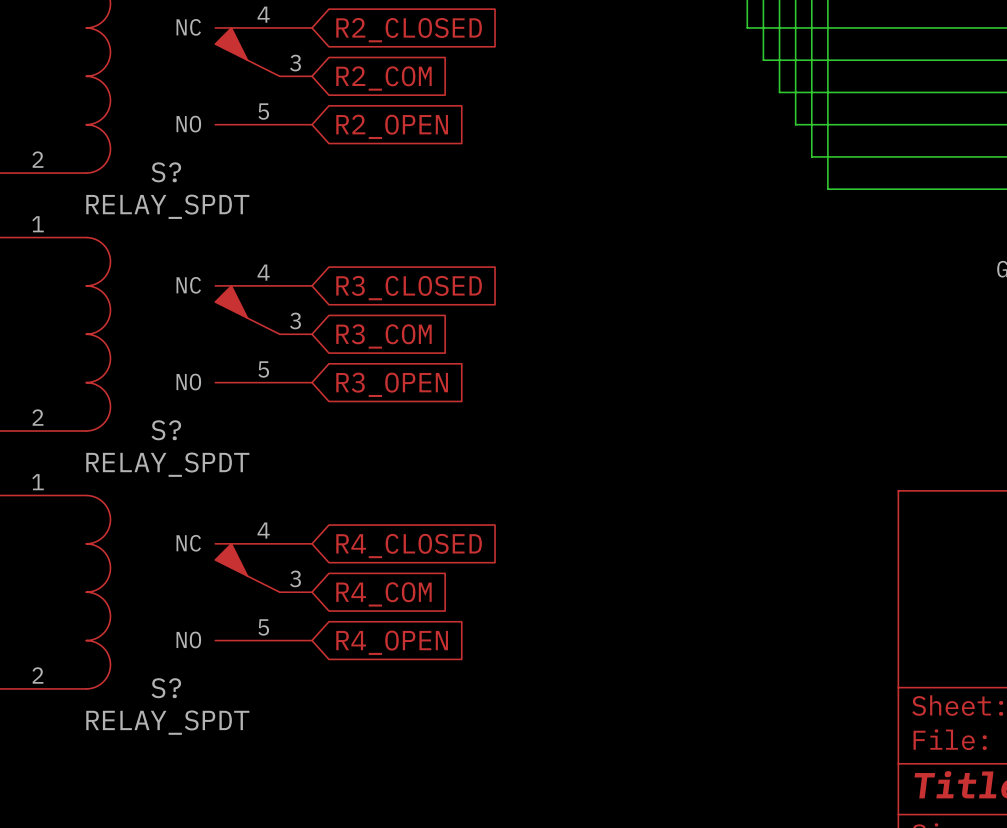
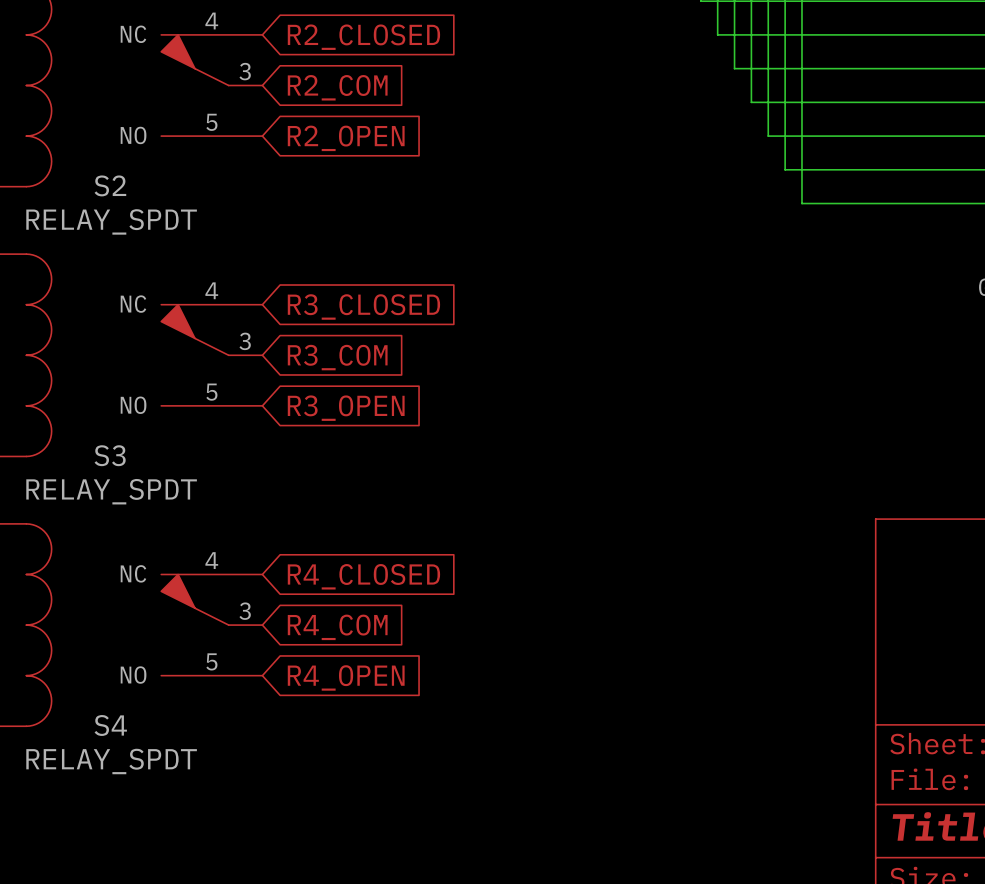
S? name: S? (166, 172) -> S2 (110, 185)
S? name: S? (166, 430) -> S3 (110, 455)
S? name: S? (166, 688) -> S4 (110, 725)

